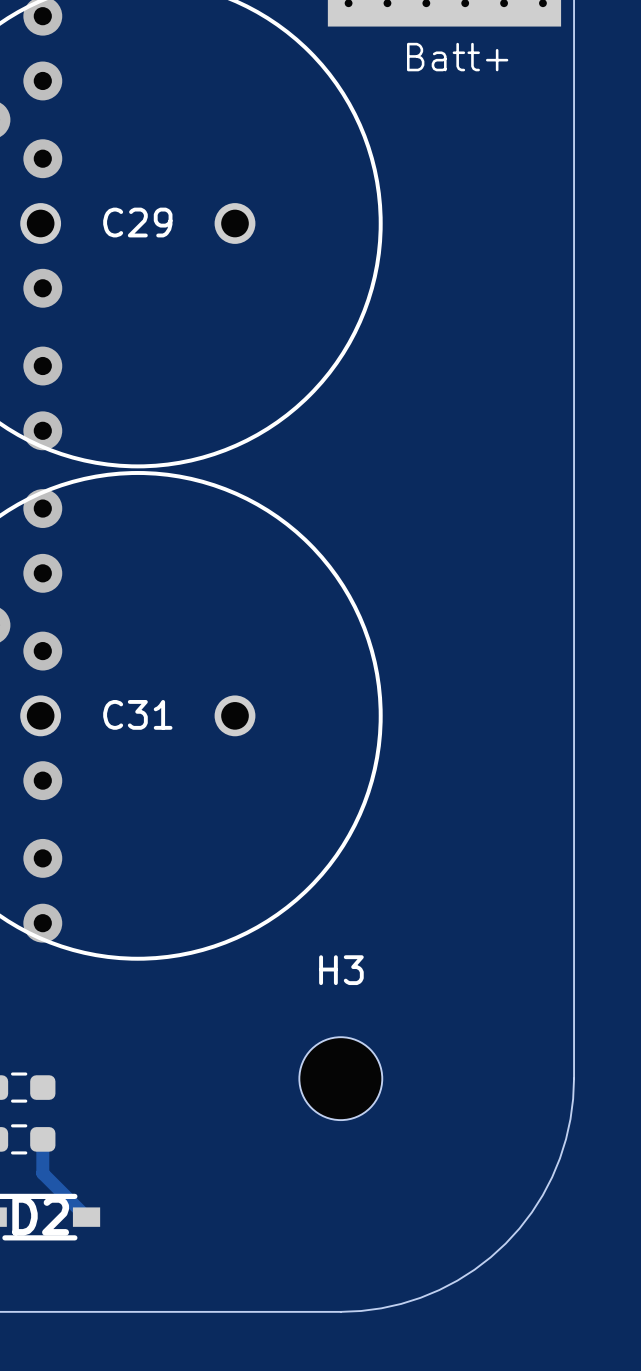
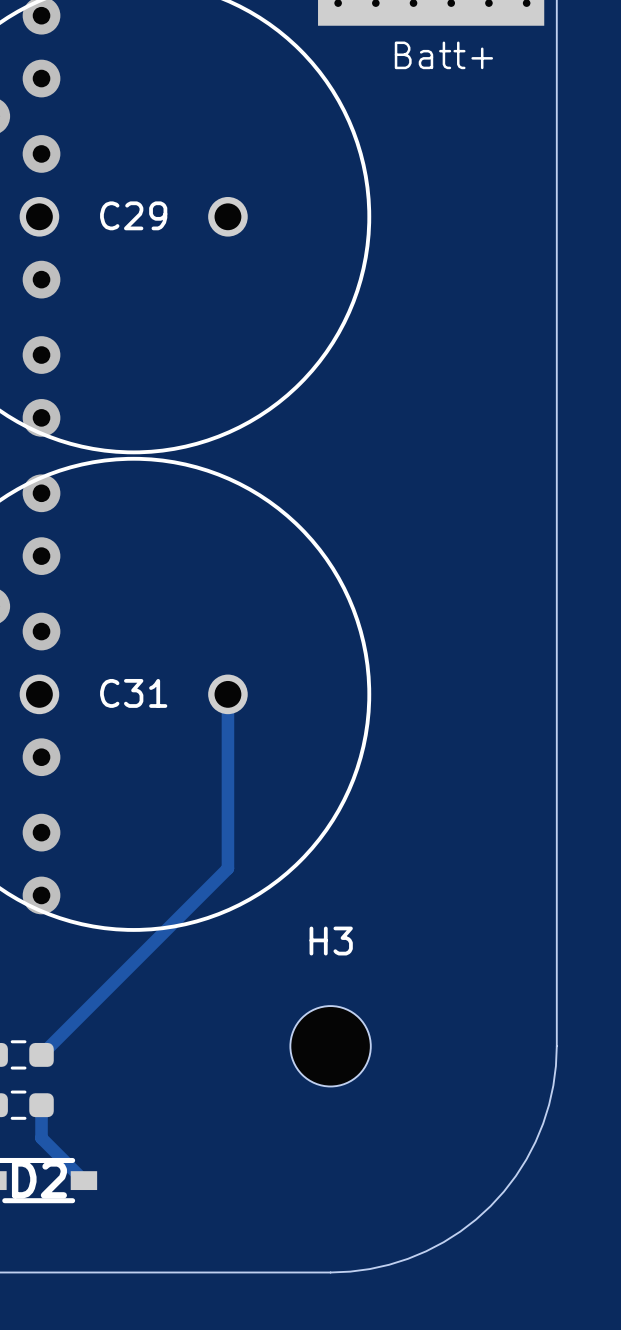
track: none -> (227, 694) (227, 868) (41, 1054)

